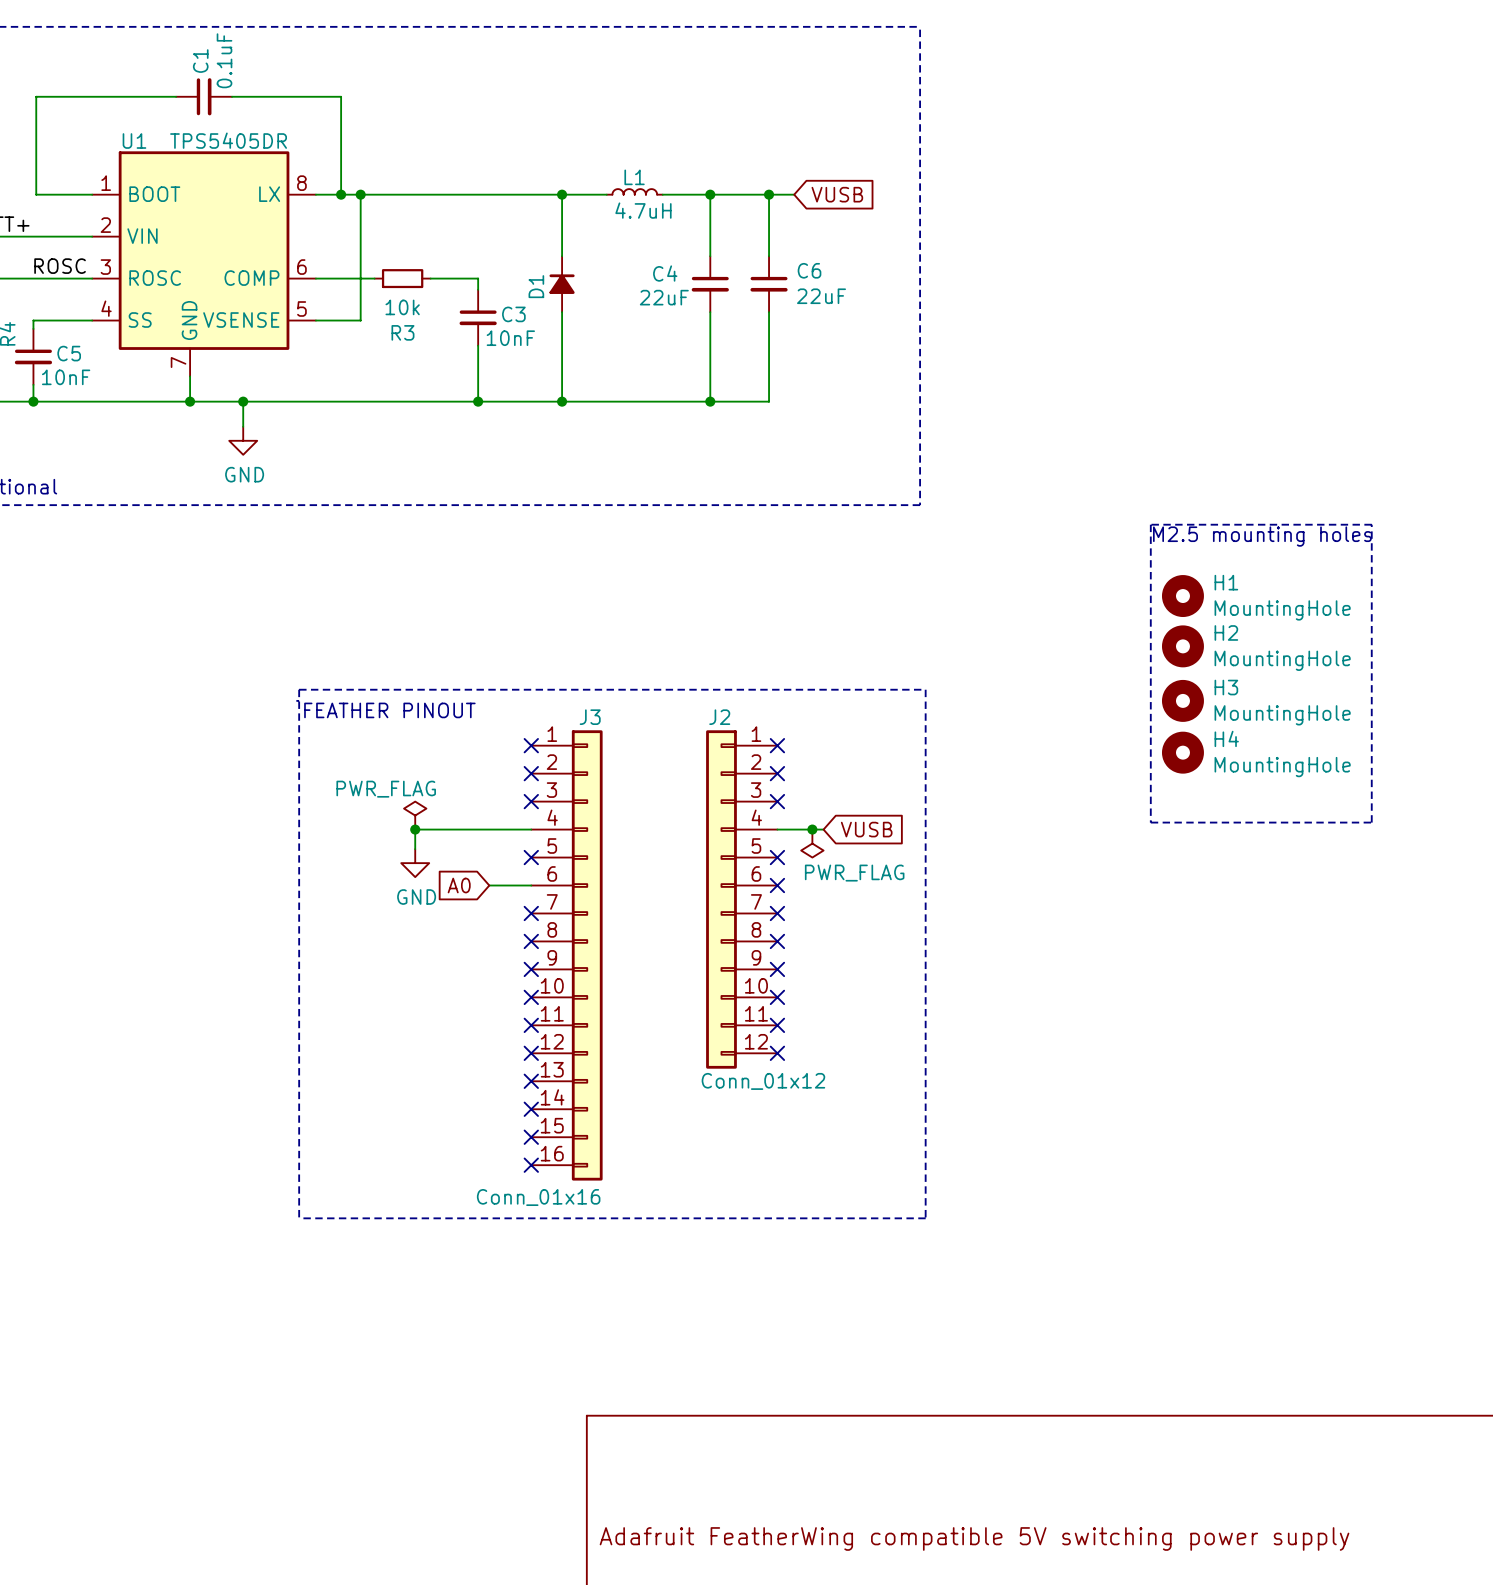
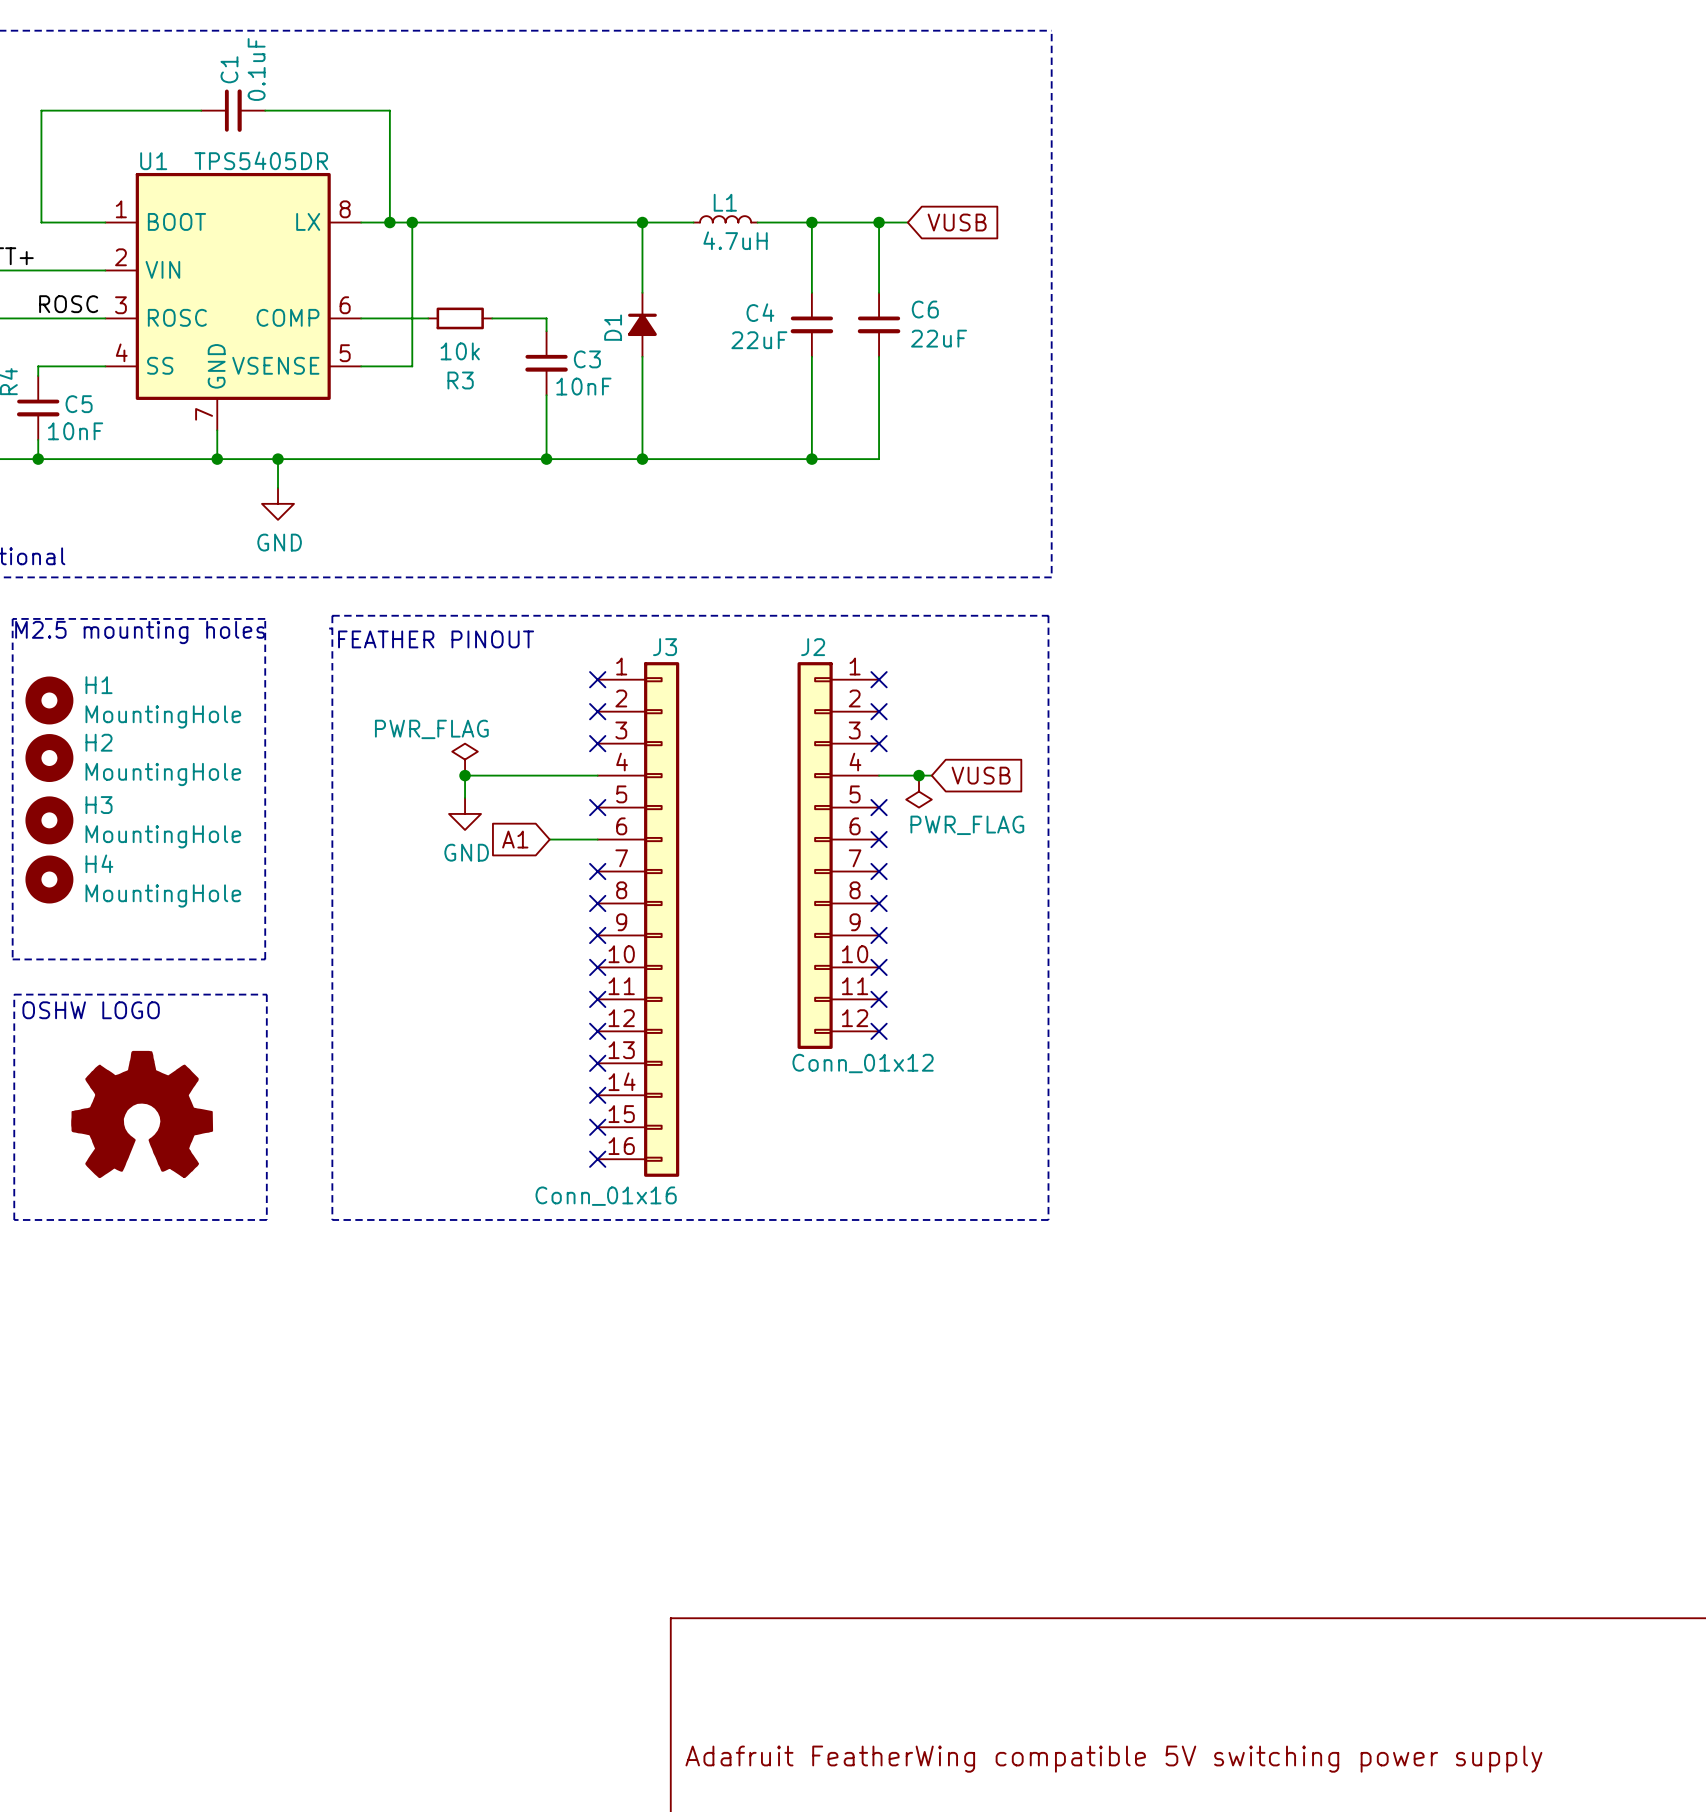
line: (1150, 524) (1371, 524) (1371, 822) (1150, 822) (1150, 524) -> none
text: M2.5 mounting holes (1262, 536) -> none
line: none -> (12, 618) (265, 618) (265, 959) (12, 959) (12, 618)
text: none -> M2.5 mounting holes (140, 632)
no-connect mark: none -> (597, 679)
no-connect mark: none -> (879, 679)
H1 position: (1182, 596) -> (49, 700)
no-connect mark: none -> (597, 711)
no-connect mark: none -> (879, 711)
H2 position: (1182, 646) -> (49, 758)
no-connect mark: none -> (597, 743)
no-connect mark: none -> (879, 743)
junction: none -> (465, 775)
junction: none -> (919, 775)
line: (299, 689) (925, 689) (925, 1218) (299, 1218) (299, 689) -> (332, 615) (1048, 615) (1048, 1219) (332, 1219) (332, 615)
line: (296, 700) (299, 700) -> (329, 628) (332, 628)
H3 position: (1182, 700) -> (49, 820)
no-connect mark: none -> (597, 807)
no-connect mark: none -> (879, 807)
text position: FEATHER PINOUT (389, 710) -> FEATHER PINOUT (436, 639)
global label: none -> A1 (515, 839)
no-connect mark: none -> (879, 839)
no-connect mark: (531, 745) -> none
no-connect mark: (777, 745) -> none
H4 position: (1182, 752) -> (49, 879)
no-connect mark: none -> (597, 871)
no-connect mark: none -> (879, 871)
no-connect mark: (531, 773) -> none
no-connect mark: (777, 773) -> none
no-connect mark: none -> (597, 903)
no-connect mark: none -> (879, 903)
no-connect mark: (531, 801) -> none
no-connect mark: (777, 801) -> none
power symbol position: PWR_FLAG (415, 815) -> PWR_FLAG (465, 759)
no-connect mark: none -> (597, 935)
no-connect mark: none -> (879, 935)
junction: (415, 829) -> none
wire: (531, 829) (415, 829) (415, 849) -> (597, 775) (465, 775) (465, 797)
wire: (777, 829) (823, 829) -> (879, 775) (931, 775)
junction: (812, 829) -> none
global label position: VUSB (866, 829) -> VUSB (981, 775)
power symbol position: PWR_FLAG (812, 843) -> PWR_FLAG (919, 791)
no-connect mark: none -> (597, 967)
no-connect mark: none -> (879, 967)
no-connect mark: (531, 857) -> none
no-connect mark: (777, 857) -> none
power symbol position: GND (415, 863) -> GND (465, 813)
line: none -> (14, 994) (14, 1219) (266, 1219) (266, 994) (14, 994)
no-connect mark: none -> (597, 999)
no-connect mark: none -> (879, 999)
text: none -> OSHW LOGO (91, 1010)
global label: A0 (459, 885) -> none
wire: (489, 885) (531, 885) -> (549, 839) (597, 839)
no-connect mark: (777, 885) -> none
J2 position: (741, 899) -> (838, 855)
no-connect mark: none -> (597, 1031)
no-connect mark: none -> (879, 1031)
no-connect mark: (531, 913) -> none
no-connect mark: (777, 913) -> none
no-connect mark: none -> (597, 1063)
no-connect mark: (531, 941) -> none
no-connect mark: (777, 941) -> none
J3 position: (566, 955) -> (638, 919)
no-connect mark: none -> (597, 1095)
no-connect mark: (531, 969) -> none
no-connect mark: (777, 969) -> none
power symbol: none -> (142, 1114)
no-connect mark: none -> (597, 1127)
no-connect mark: (531, 997) -> none
no-connect mark: (777, 997) -> none
no-connect mark: none -> (597, 1159)
no-connect mark: (531, 1025) -> none
no-connect mark: (777, 1025) -> none
no-connect mark: (531, 1053) -> none
no-connect mark: (777, 1053) -> none
no-connect mark: (531, 1081) -> none
no-connect mark: (531, 1109) -> none
no-connect mark: (531, 1137) -> none
no-connect mark: (531, 1165) -> none

